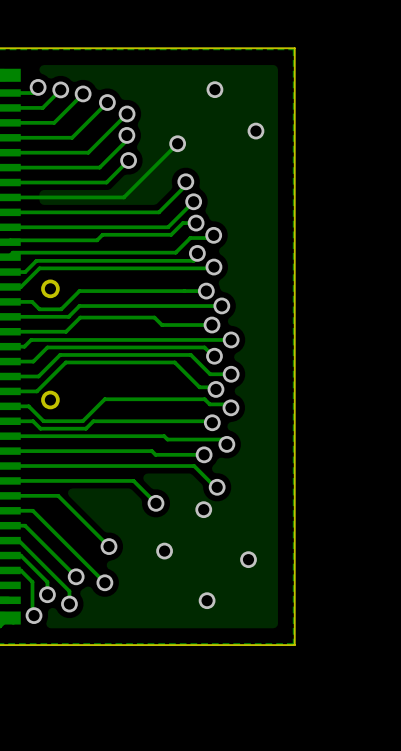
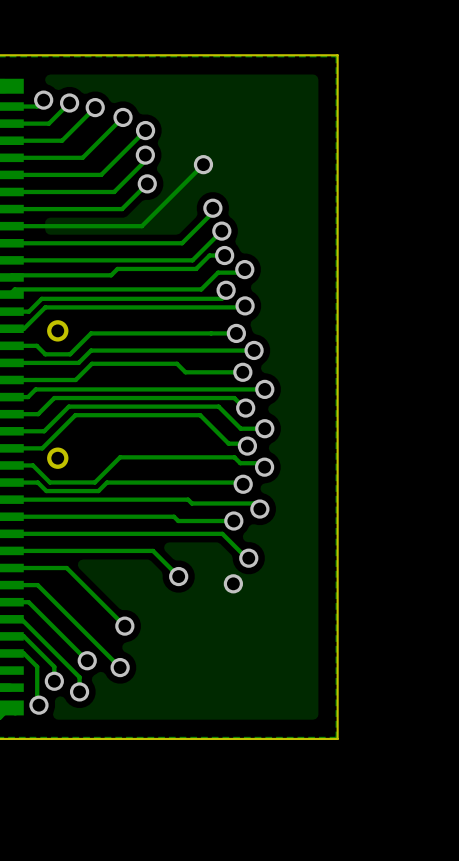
via: (214, 89) -> none
via: (255, 131) -> none
via: (164, 551) -> none
via: (248, 559) -> none
via: (207, 600) -> none

